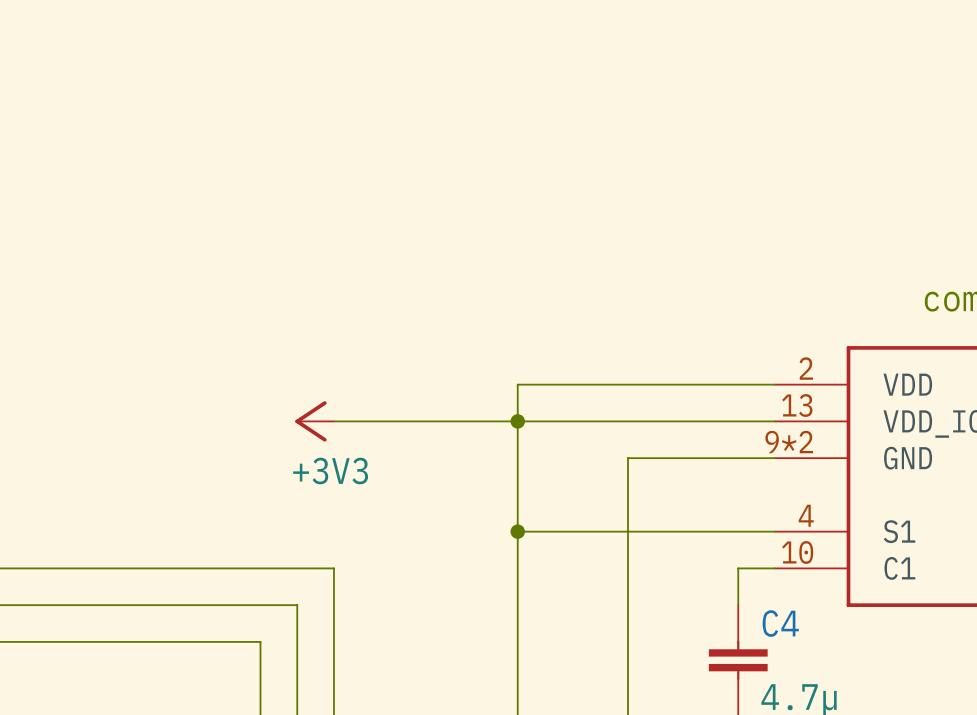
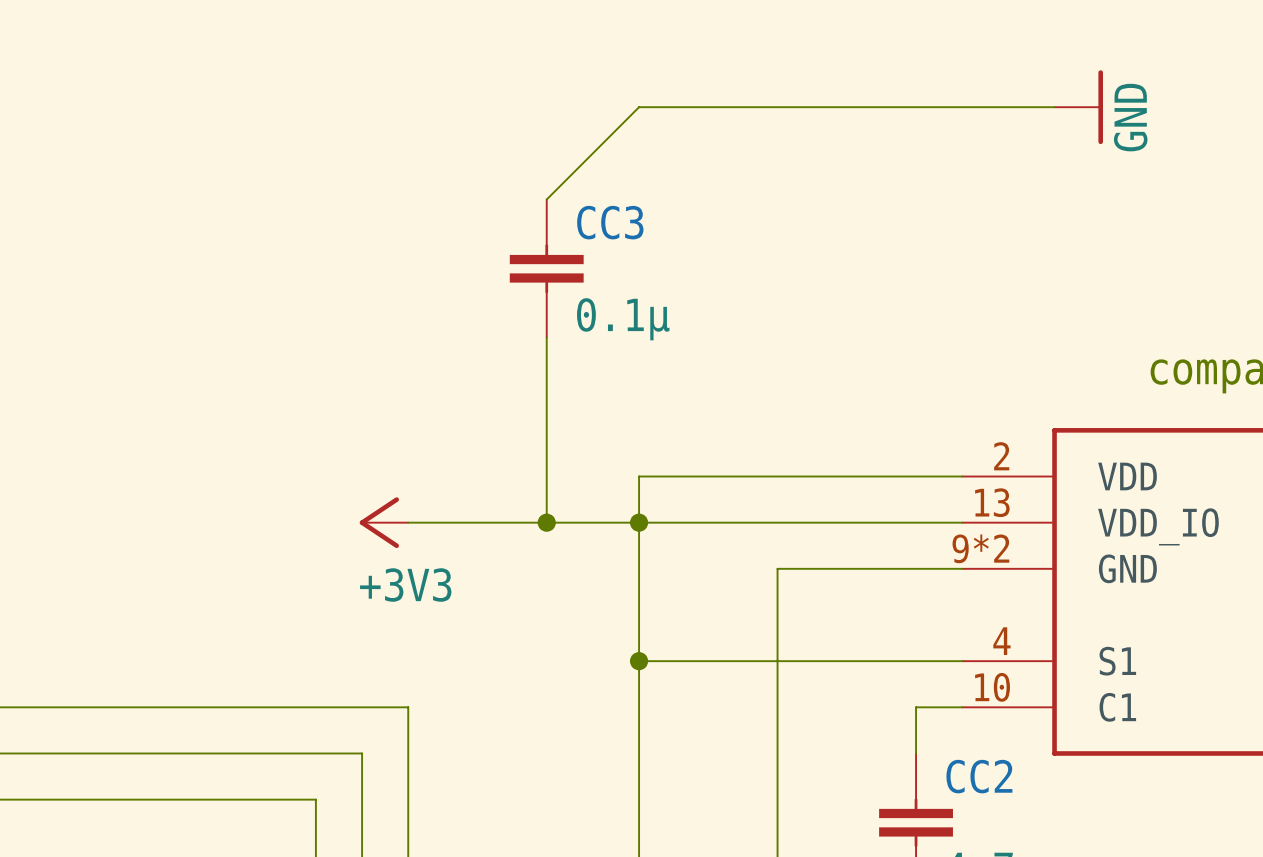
wire: none -> (1054, 107) (639, 107) (546, 199)
power symbol: none -> GND (1078, 107)
CC3: none -> 0.1µ (546, 268)
wire: none -> (546, 338) (546, 522)
junction: none -> (546, 522)
C4 name: C4 (780, 623) -> CC2 (979, 776)

